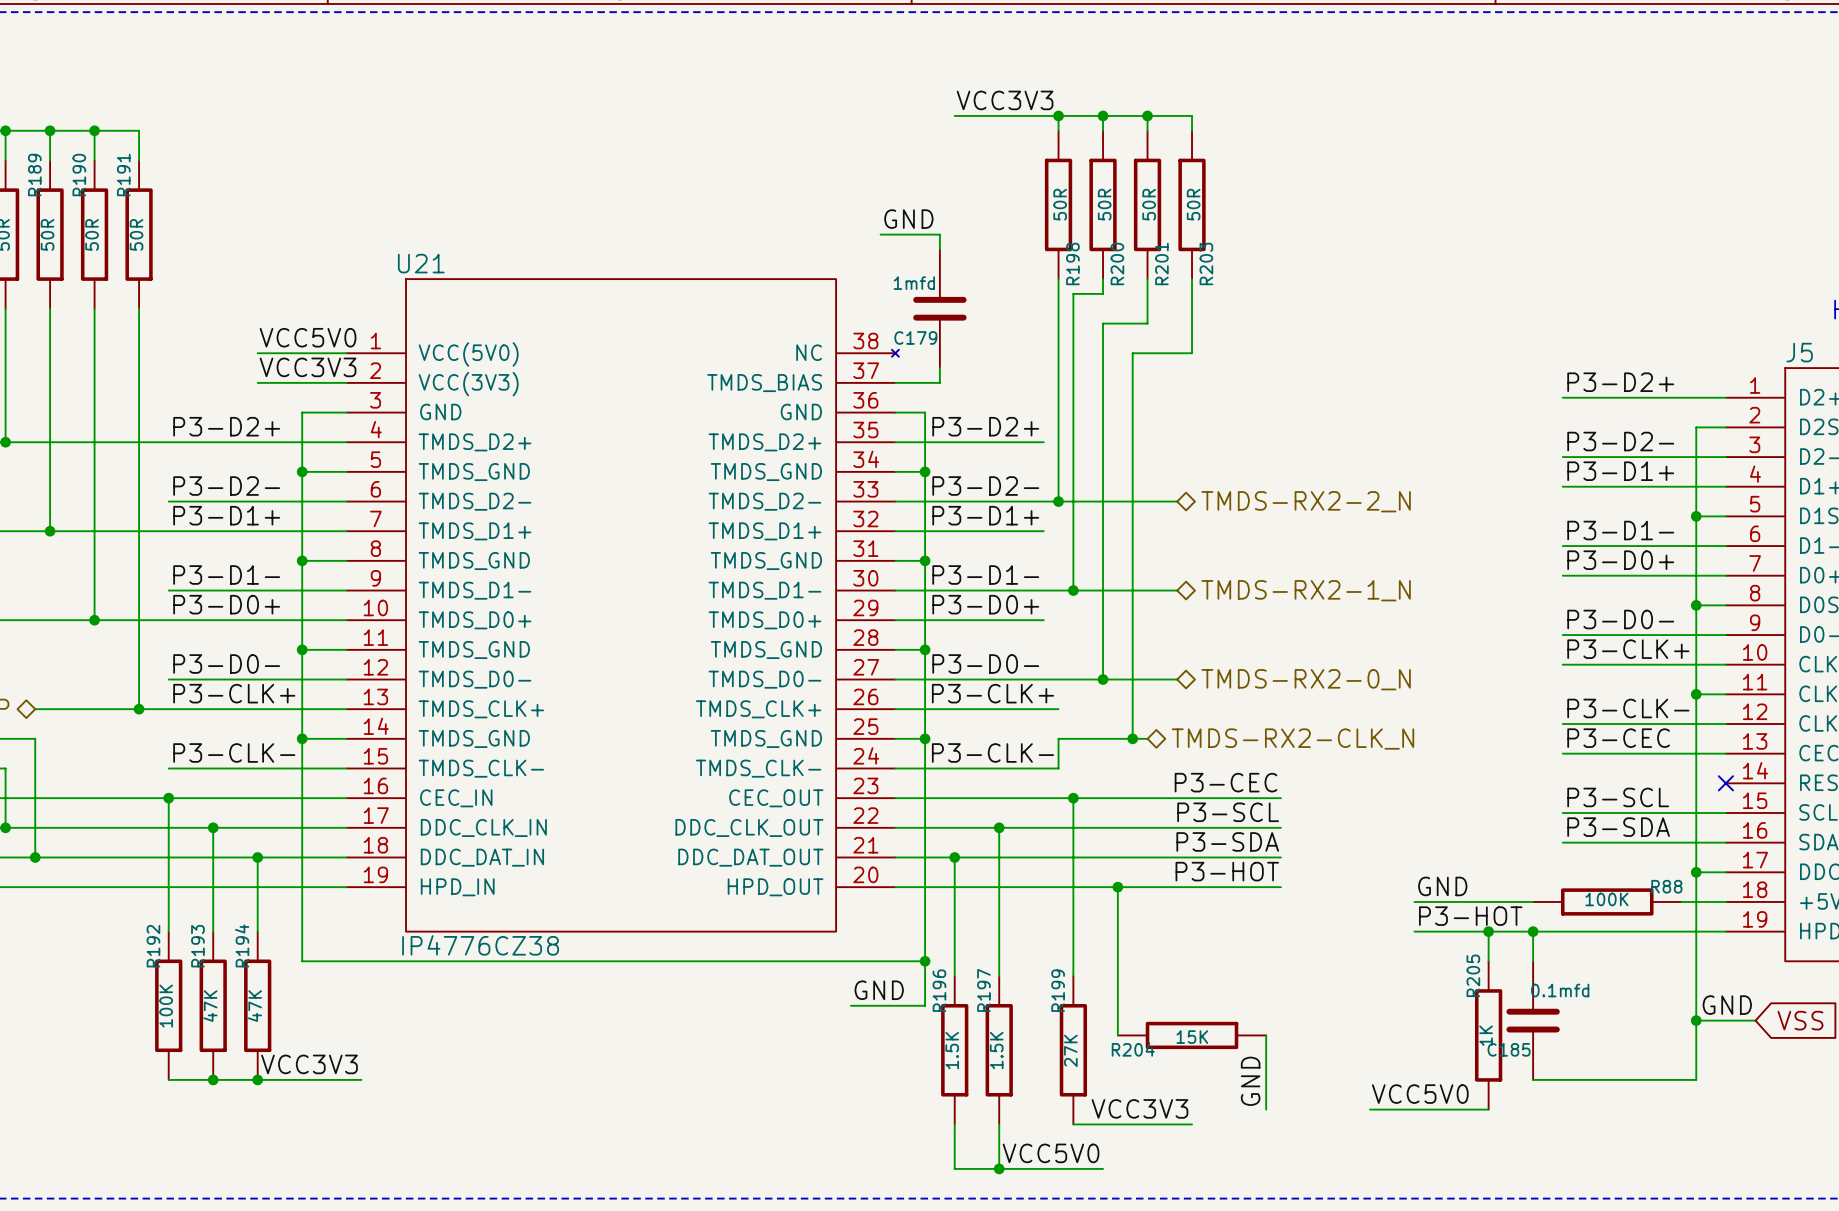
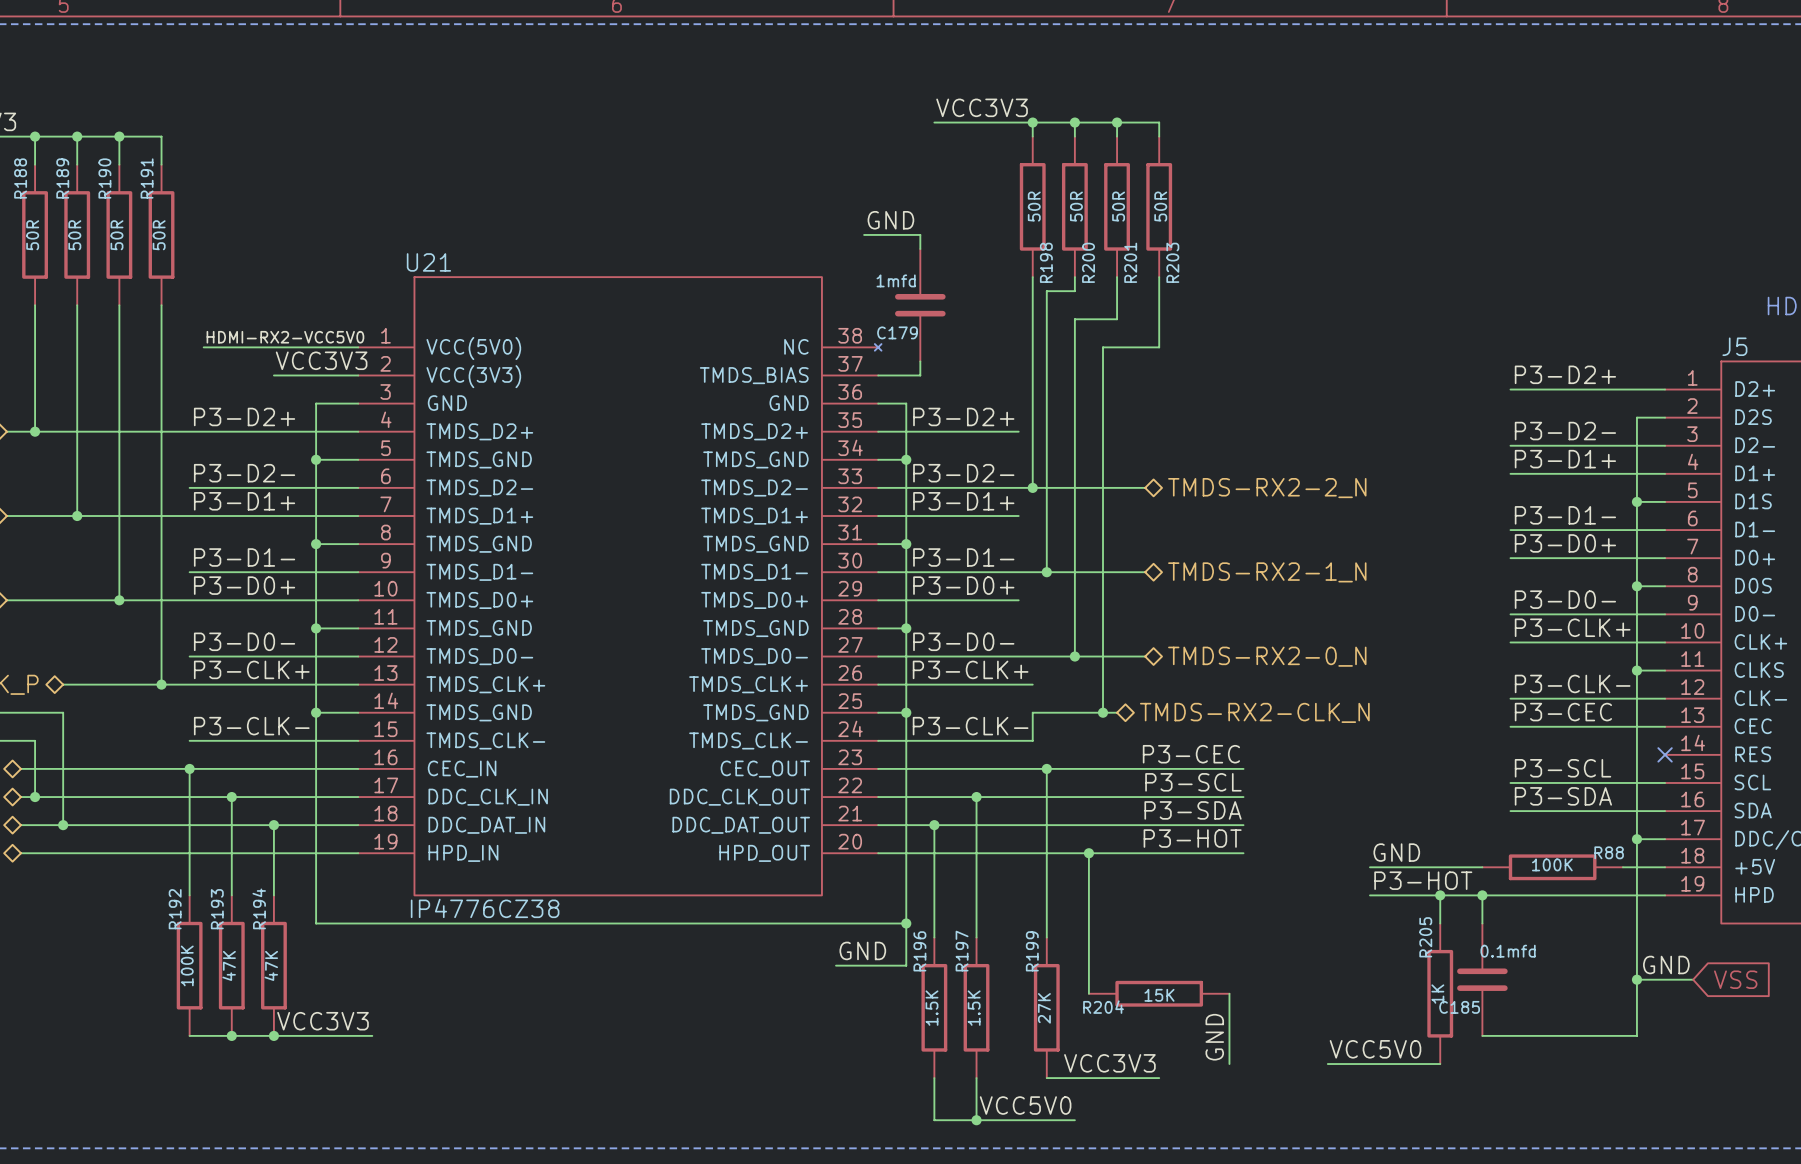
label: VCC5V0 (308, 337) -> none
label: none -> HDMI-RX2-VCC5V0 (285, 337)
wire: none -> (203, 347) (273, 347)

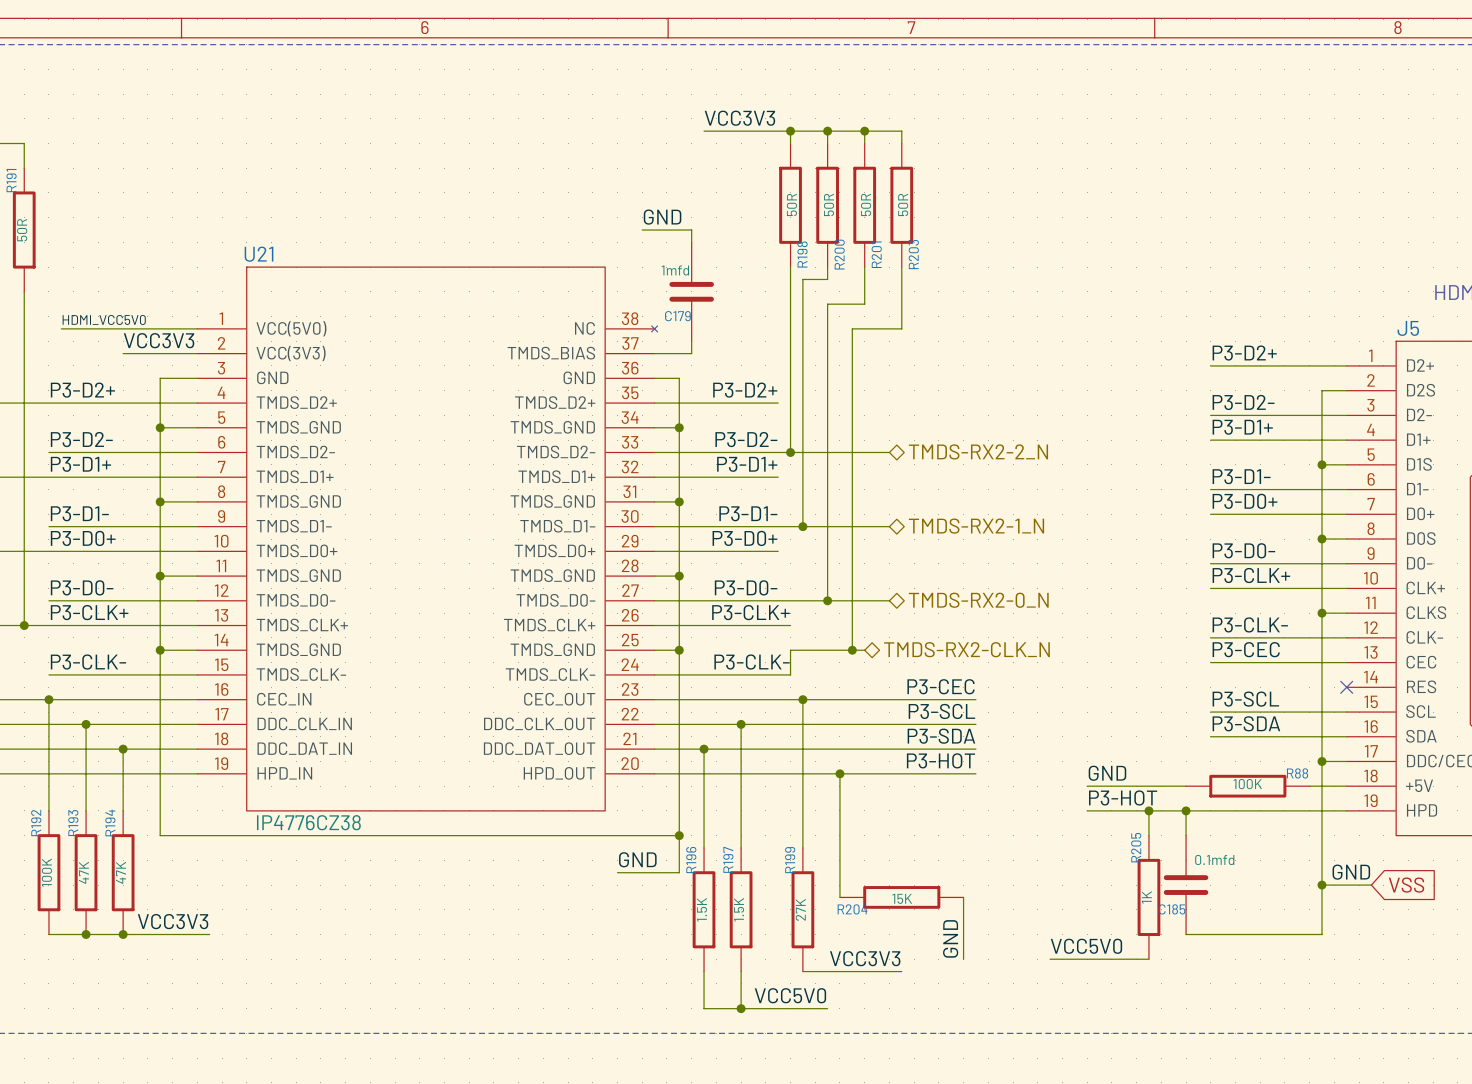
label: HDMI-RX2-VCC5V0 (285, 337) -> HDMI_VCC5V0 (104, 319)

